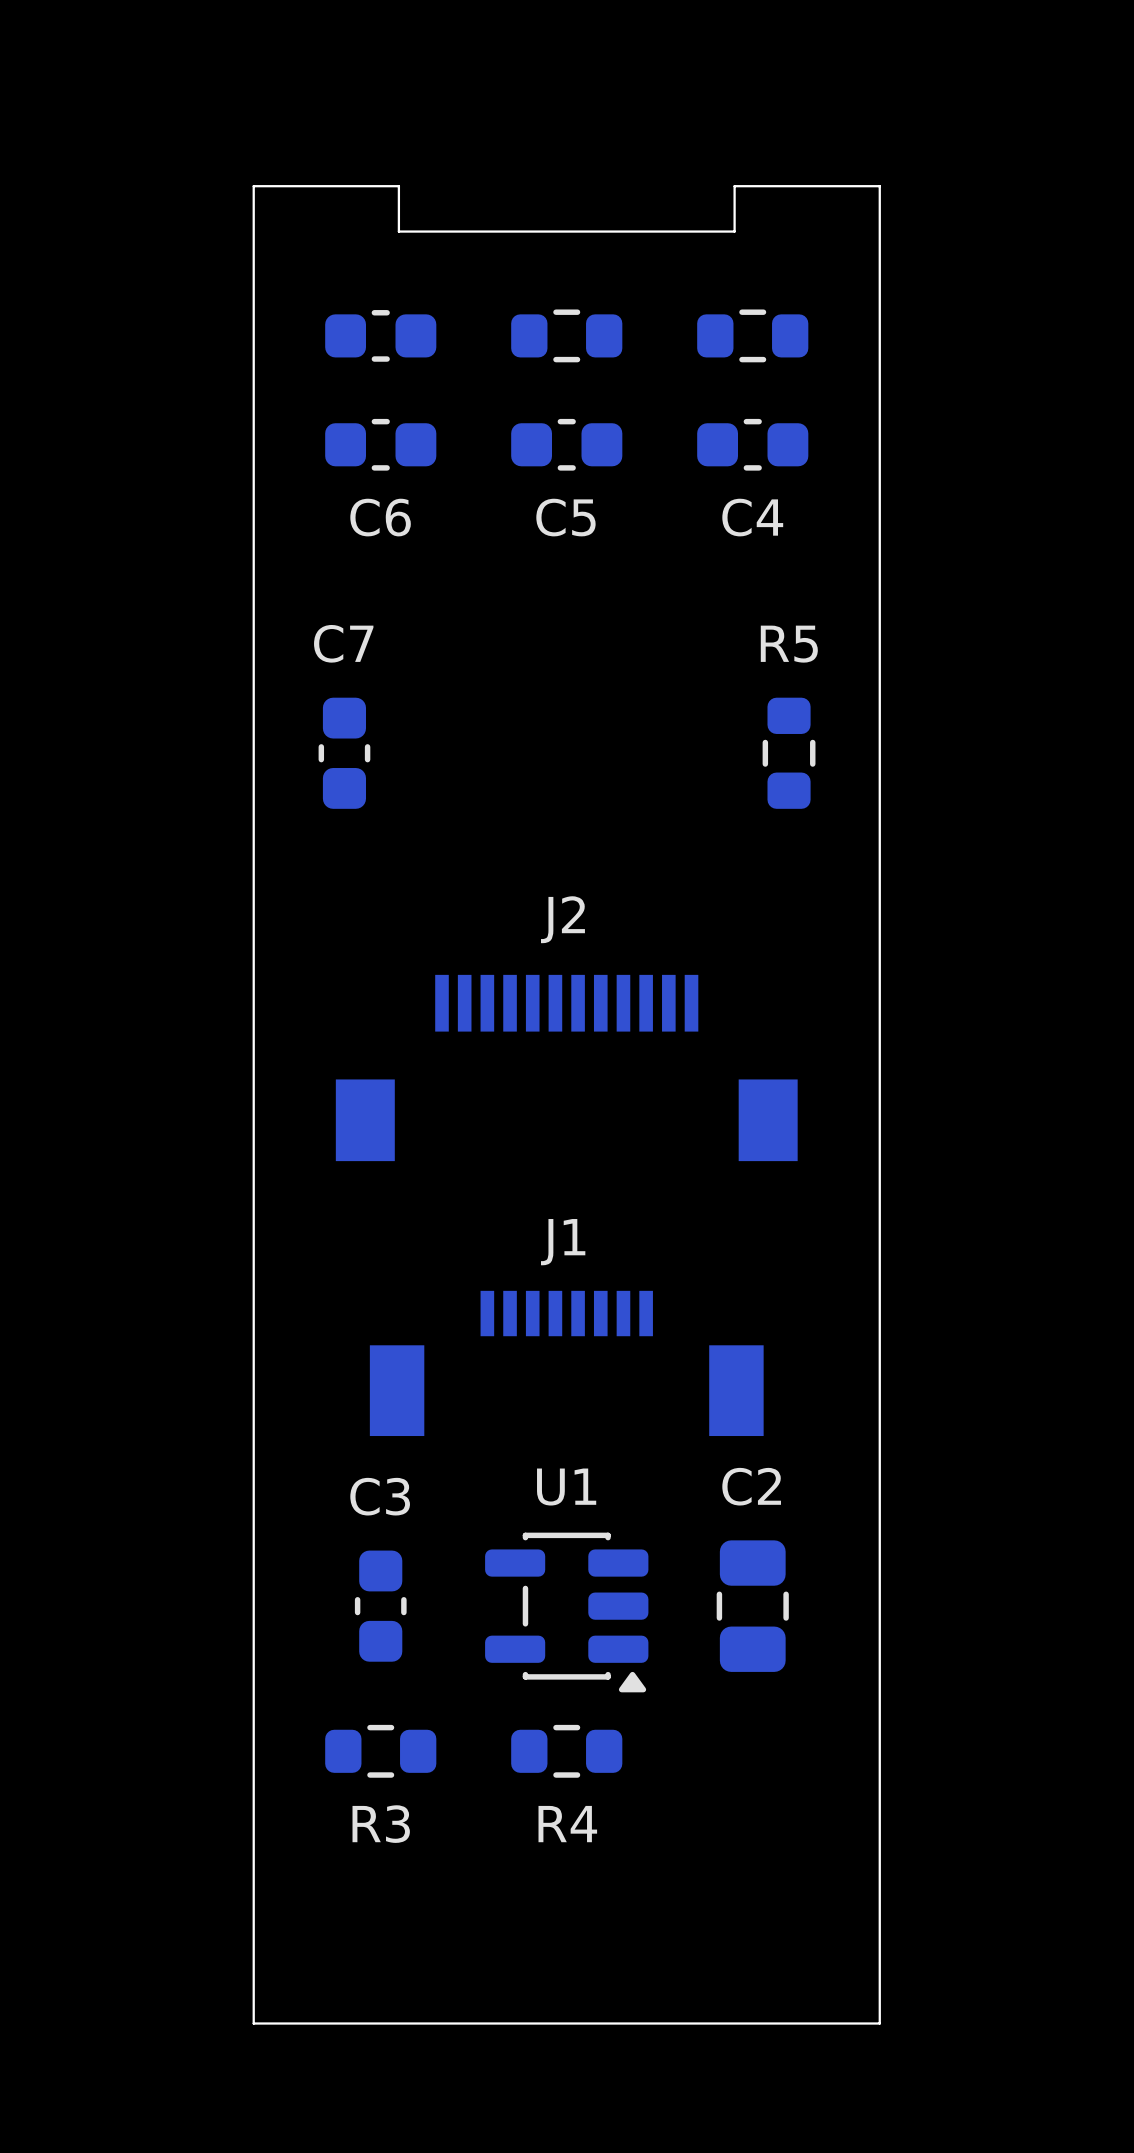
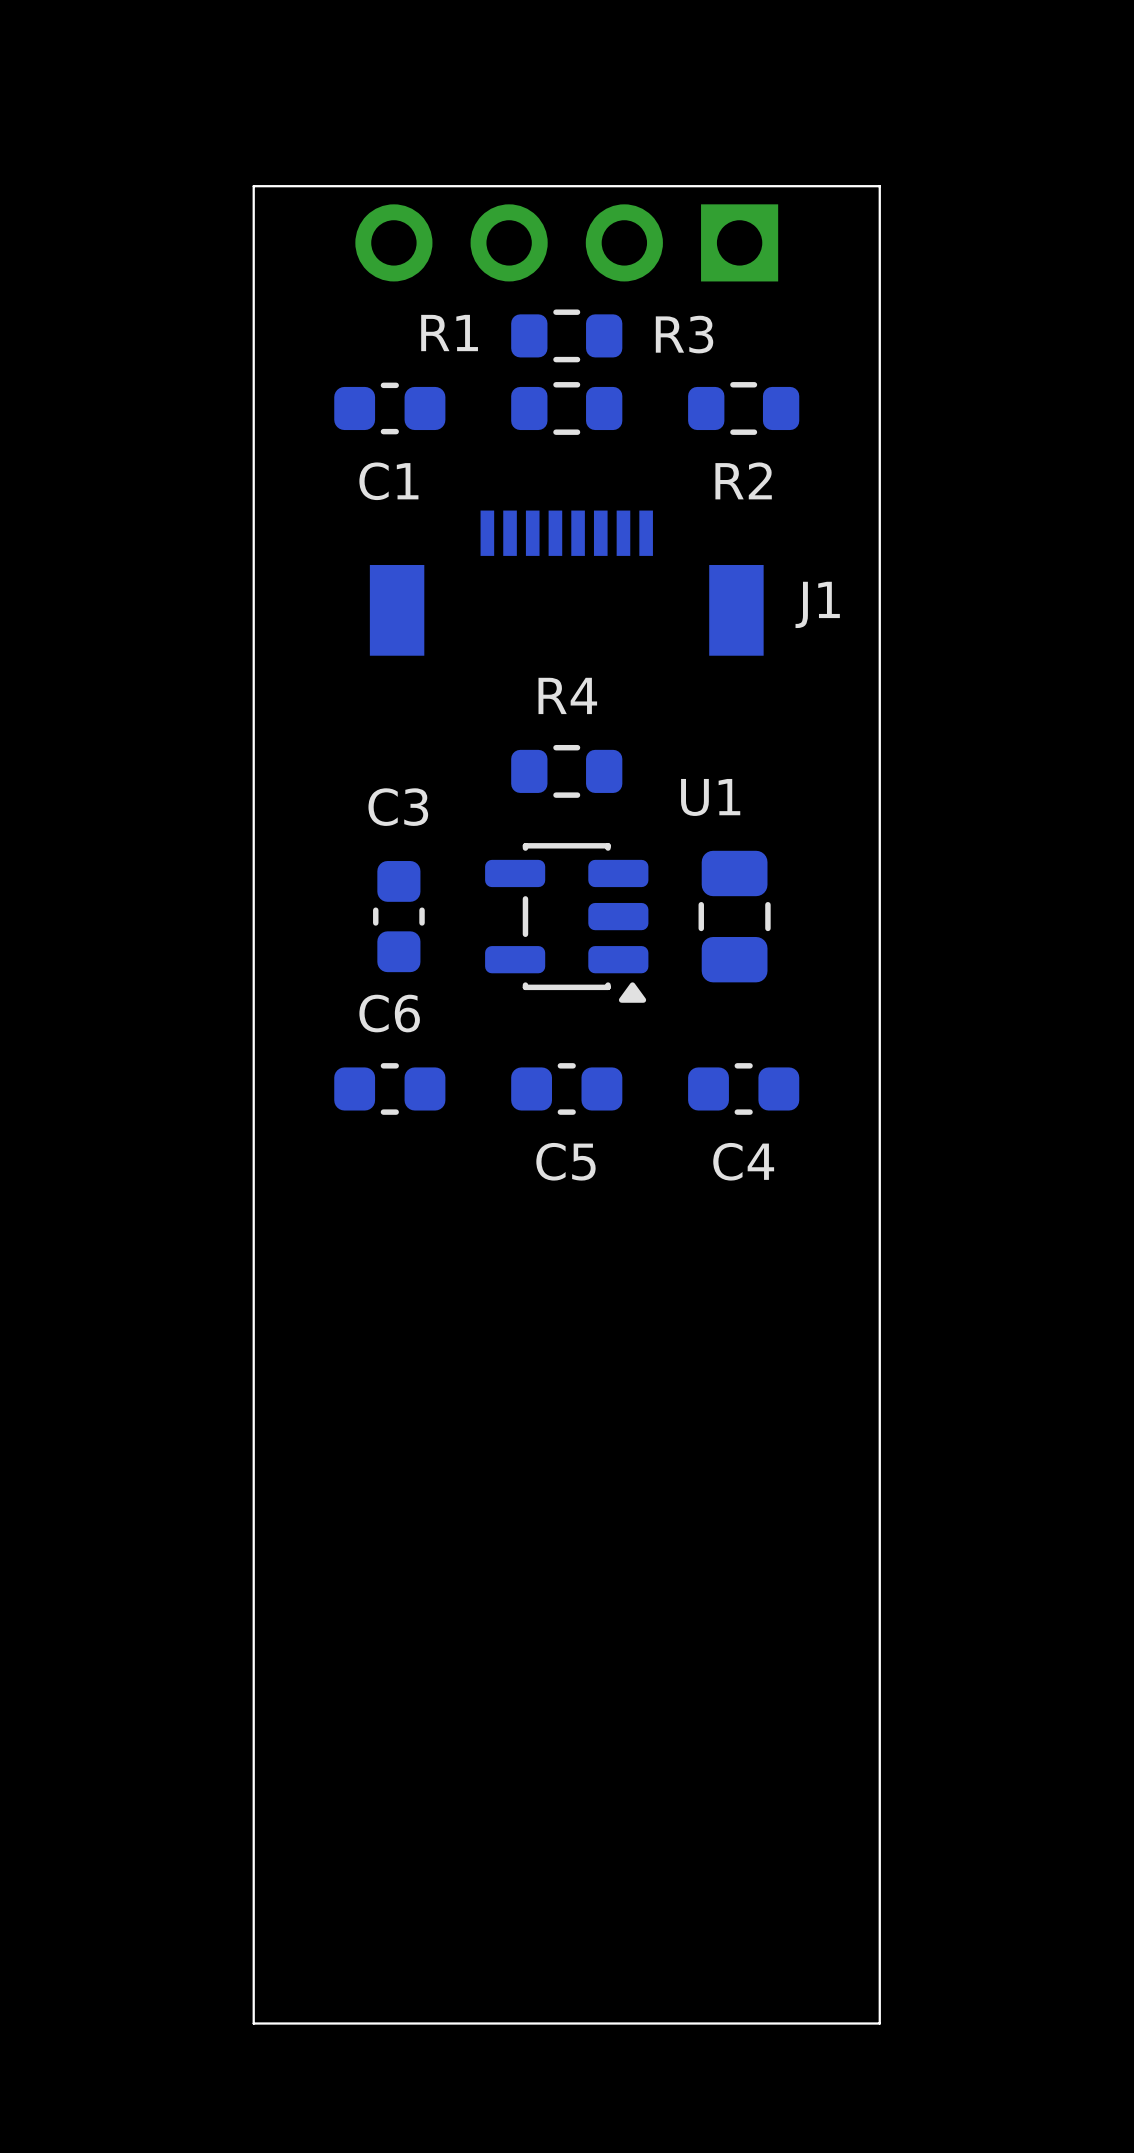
board edge: (734, 186) (734, 231) (398, 231) (398, 186) -> (734, 186) (398, 186)
part: none -> (566, 242)
R3 name: none -> R3 (684, 334)
part: (380, 335) -> none
part: (752, 335) -> none
C1: none -> (389, 408)
R1: none -> (566, 408)
R2: none -> (743, 408)
C6 position: (380, 444) -> (389, 1088)
C5 position: (566, 444) -> (566, 1088)
C4 position: (752, 444) -> (743, 1088)
C6 name position: C6 (380, 517) -> C6 (389, 1013)
C7: (344, 753) -> none
R5: (789, 753) -> none
part: none -> (734, 916)
J2: (566, 1067) -> none
J1 name position: J1 (563, 1242) -> J1 (817, 604)
J1 position: (566, 1360) -> (566, 579)
U1 name position: U1 (566, 1487) -> U1 (710, 797)
C3 position: (380, 1606) -> (398, 916)
C2: (752, 1606) -> none
U1 position: (566, 1612) -> (566, 922)
R3: (380, 1751) -> none
R4 position: (566, 1751) -> (566, 771)
R4 name position: R4 (567, 1824) -> R4 (567, 695)

